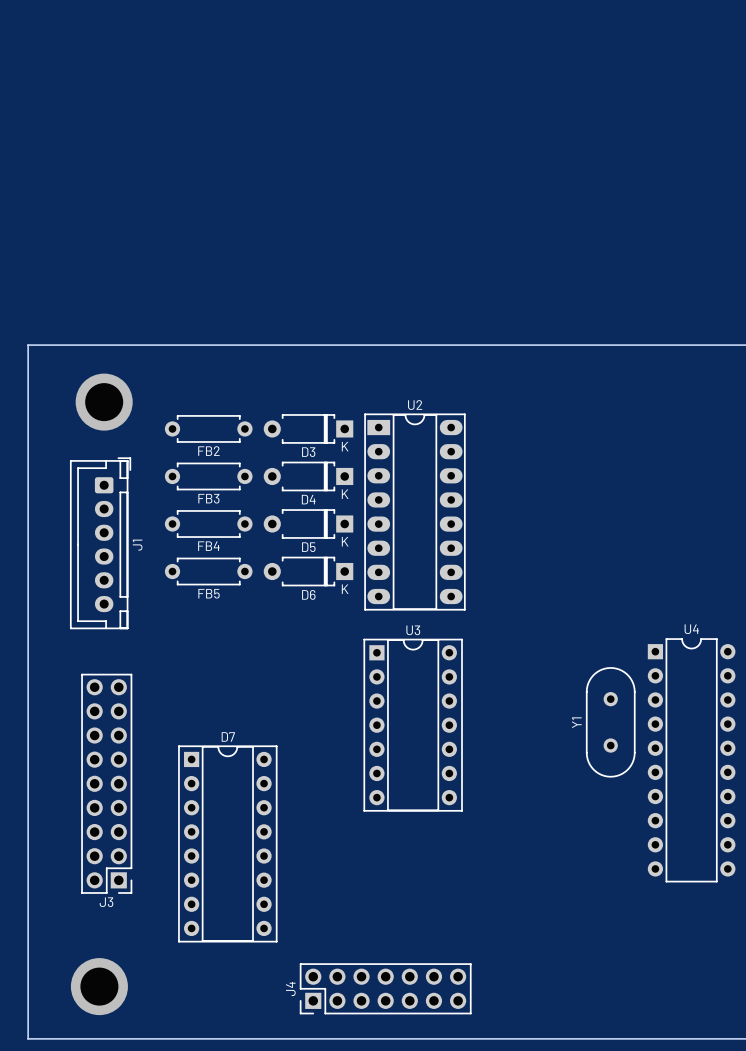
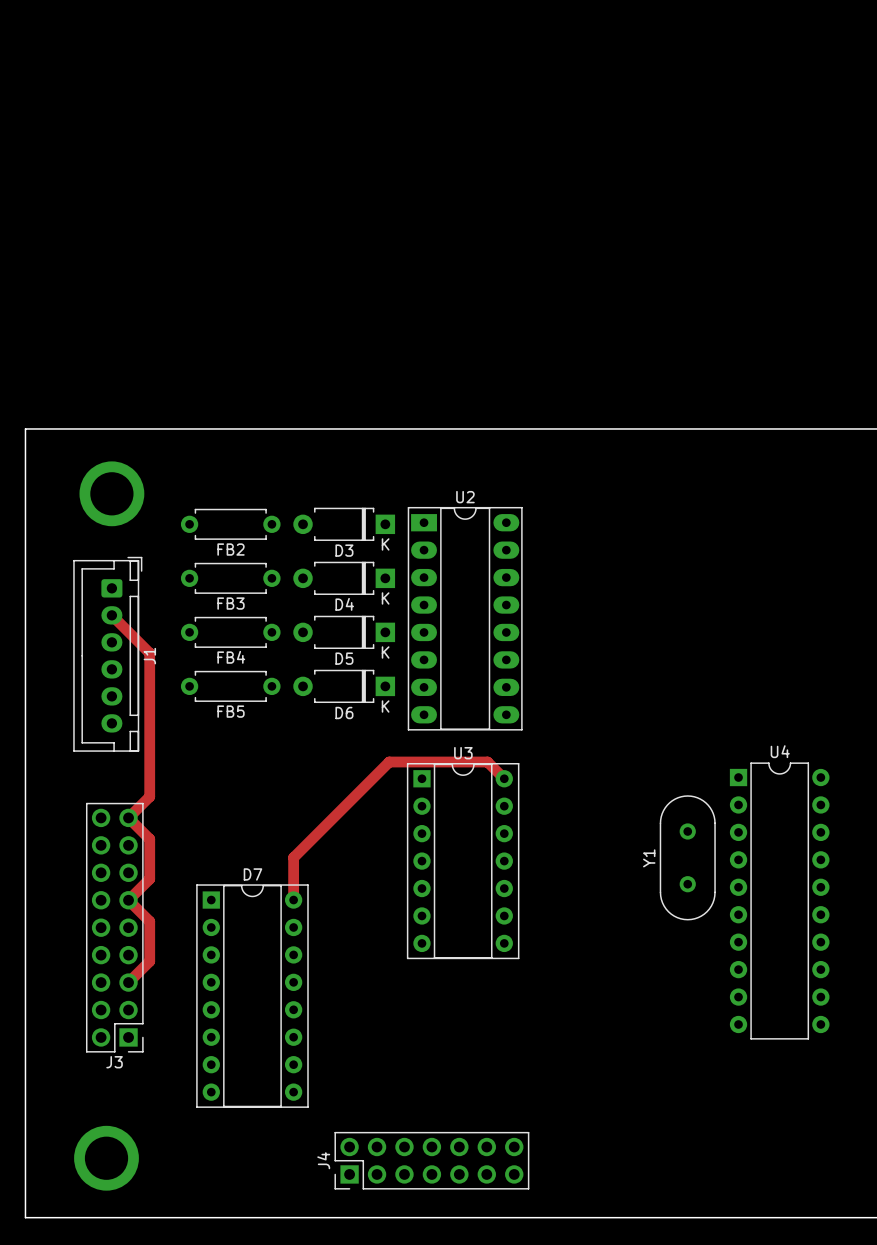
track: none -> (111, 615) (149, 653) (149, 796) (128, 817) (149, 839) (149, 879) (128, 900) (149, 921) (149, 961) (128, 982)
track: none -> (504, 778) (487, 762) (389, 762) (293, 857) (293, 900)

